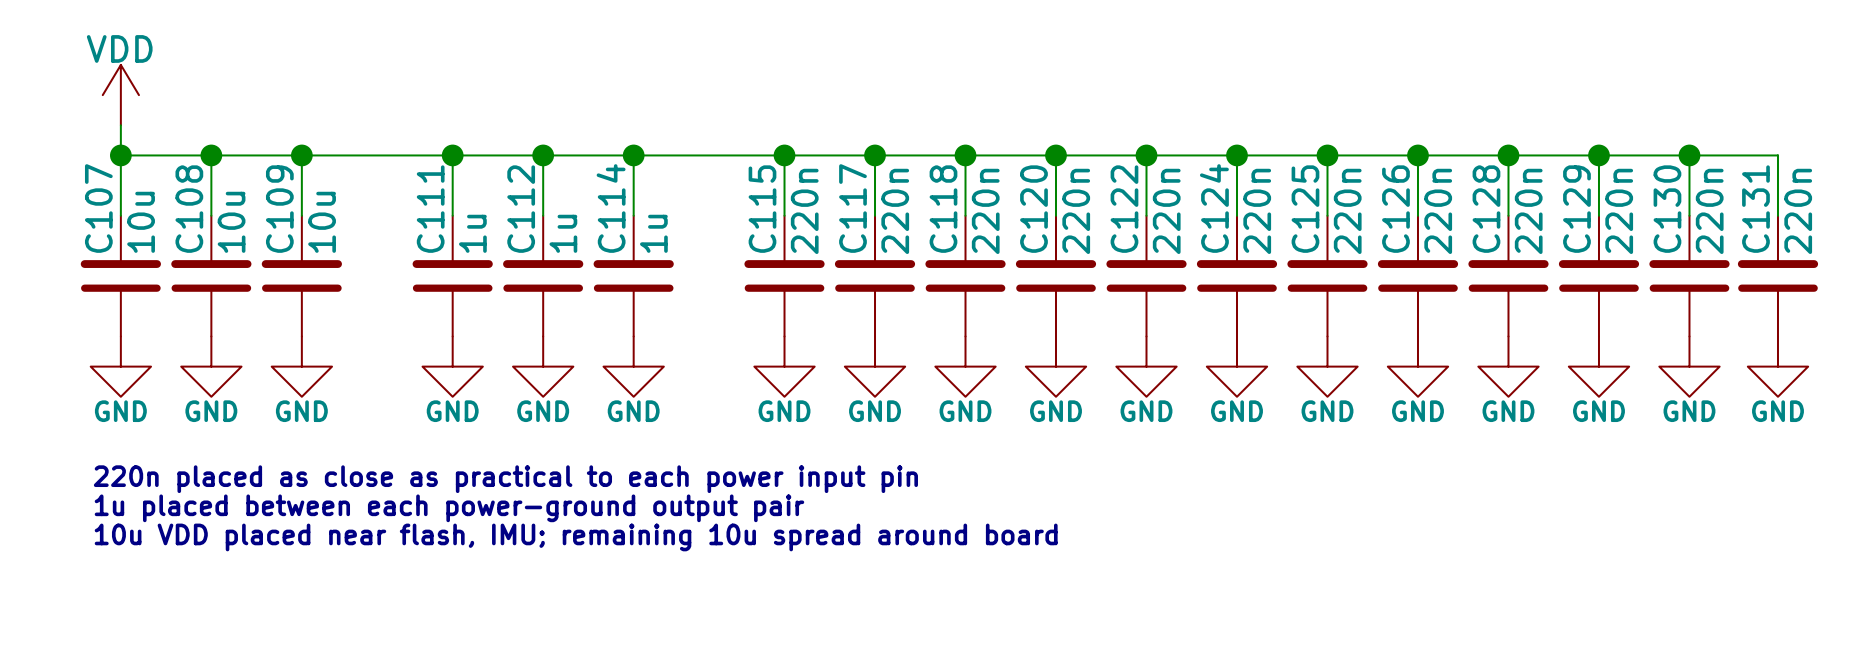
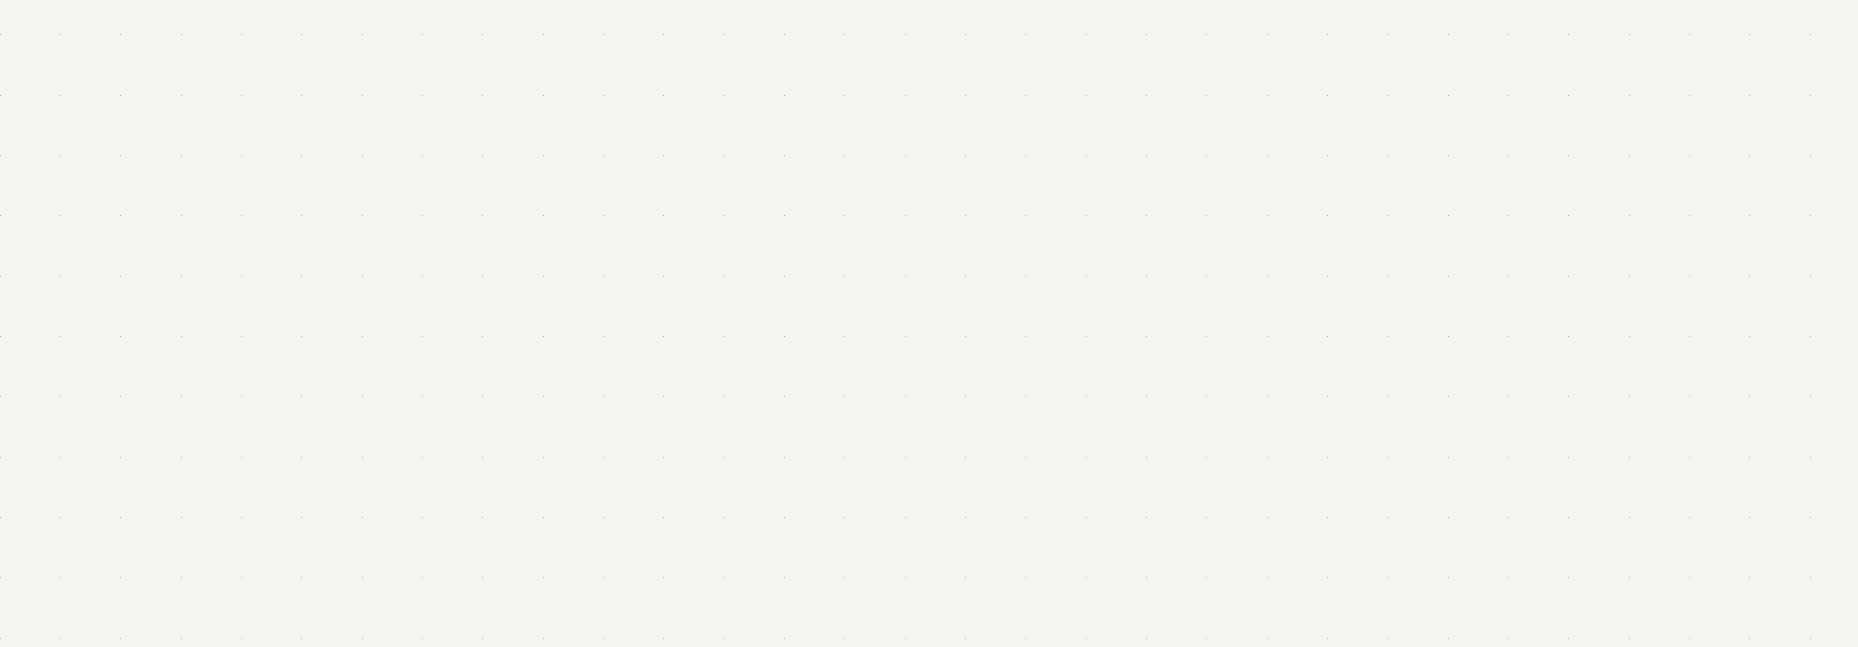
power symbol: VDD (120, 95) -> none
wire: (120, 125) (120, 215) -> none
wire: (120, 155) (1777, 155) (1777, 215) -> none
junction: (120, 155) -> none
wire: (211, 155) (211, 215) -> none
junction: (211, 155) -> none
wire: (301, 155) (301, 215) -> none
junction: (301, 155) -> none
wire: (452, 155) (452, 215) -> none
junction: (452, 155) -> none
wire: (543, 155) (543, 215) -> none
junction: (543, 155) -> none
wire: (633, 155) (633, 215) -> none
junction: (633, 155) -> none
wire: (784, 155) (784, 215) -> none
junction: (784, 155) -> none
wire: (875, 155) (875, 215) -> none
junction: (875, 155) -> none
wire: (965, 155) (965, 215) -> none
junction: (965, 155) -> none
wire: (1056, 155) (1056, 215) -> none
junction: (1056, 155) -> none
wire: (1146, 155) (1146, 215) -> none
junction: (1146, 155) -> none
wire: (1236, 155) (1236, 215) -> none
junction: (1236, 155) -> none
wire: (1327, 155) (1327, 215) -> none
junction: (1327, 155) -> none
wire: (1417, 155) (1417, 215) -> none
junction: (1417, 155) -> none
wire: (1508, 155) (1508, 215) -> none
junction: (1508, 155) -> none
wire: (1598, 155) (1598, 215) -> none
junction: (1598, 155) -> none
wire: (1689, 155) (1689, 215) -> none
junction: (1689, 155) -> none
C107: 10u (120, 276) -> none
C108: 10u (211, 276) -> none
C109: 10u (301, 276) -> none
C111: 1u (452, 276) -> none
C112: 1u (543, 276) -> none
C114: 1u (633, 276) -> none
C115: 220n (784, 276) -> none
C117: 220n (875, 276) -> none
C118: 220n (965, 276) -> none
C120: 220n (1056, 276) -> none
C122: 220n (1146, 276) -> none
C124: 220n (1236, 276) -> none
C125: 220n (1327, 276) -> none
C126: 220n (1417, 276) -> none
C128: 220n (1508, 276) -> none
C129: 220n (1598, 276) -> none
C130: 220n (1689, 276) -> none
C131: 220n (1777, 276) -> none
power symbol: GND (120, 366) -> none
power symbol: GND (211, 366) -> none
power symbol: GND (301, 366) -> none
power symbol: GND (452, 366) -> none
power symbol: GND (543, 366) -> none
power symbol: GND (633, 366) -> none
power symbol: GND (784, 366) -> none
power symbol: GND (875, 366) -> none
power symbol: GND (965, 366) -> none
power symbol: GND (1056, 366) -> none
power symbol: GND (1146, 366) -> none
power symbol: GND (1236, 366) -> none
power symbol: GND (1327, 366) -> none
power symbol: GND (1417, 366) -> none
power symbol: GND (1508, 366) -> none
power symbol: GND (1598, 366) -> none
power symbol: GND (1689, 366) -> none
power symbol: GND (1777, 366) -> none
text: 220n placed as close as practical to each power input pin (505, 479) -> none
text: 1u placed between each power-ground output pair (449, 508) -> none
text: 10u VDD placed near flash, IMU; remaining 10u spread around board (576, 537) -> none

